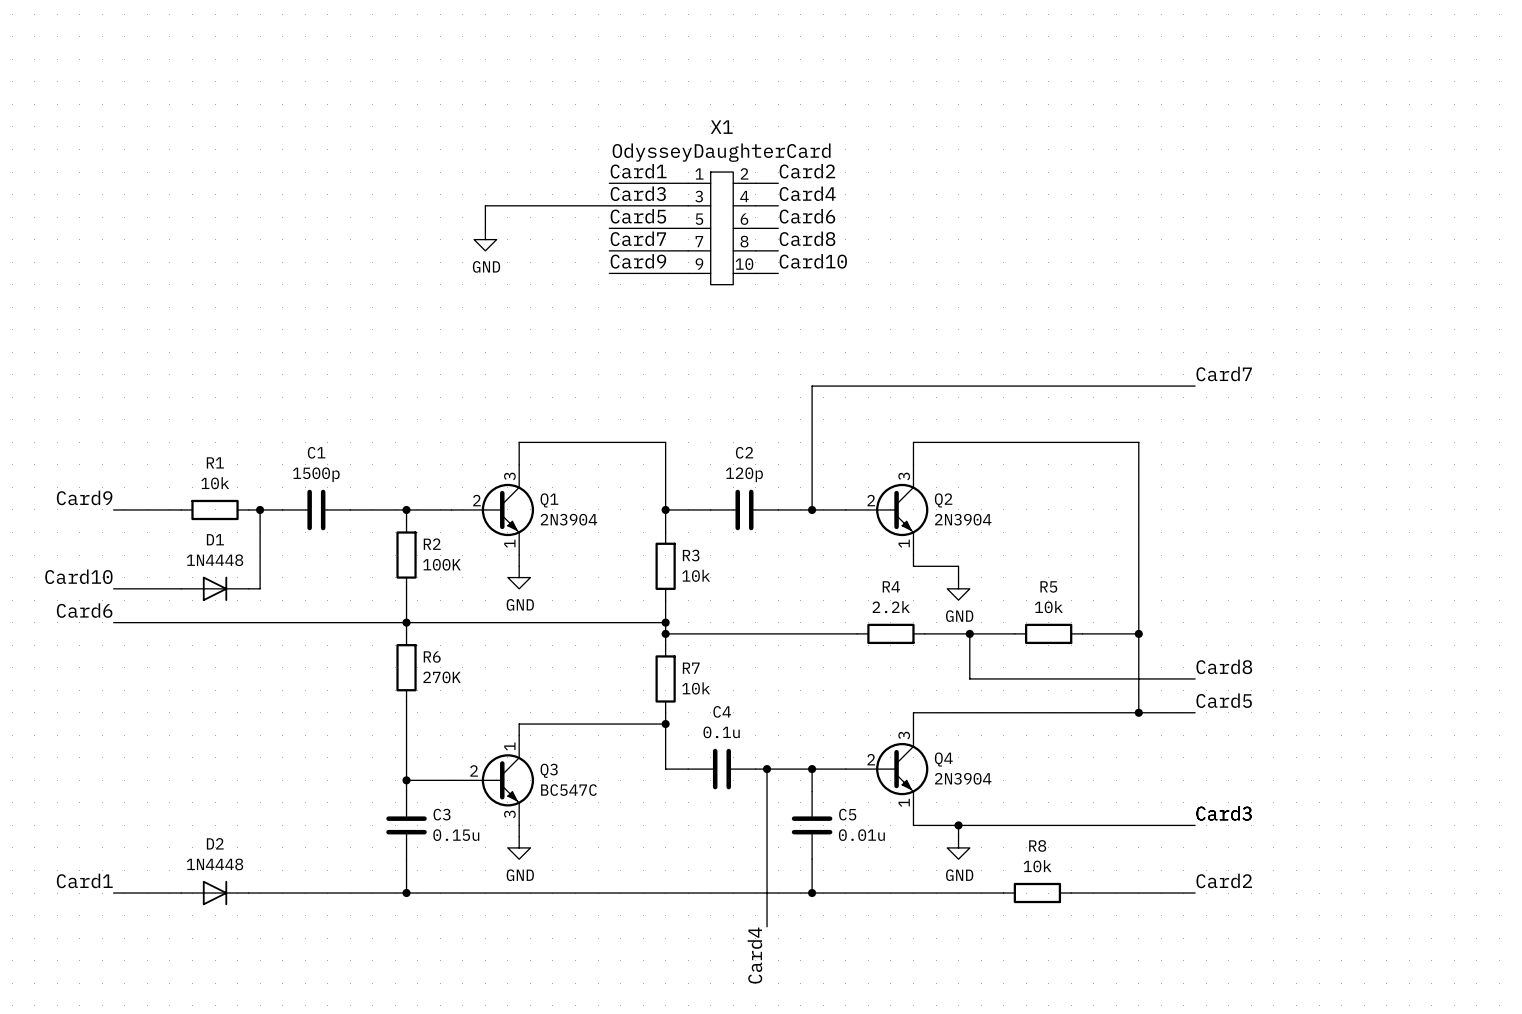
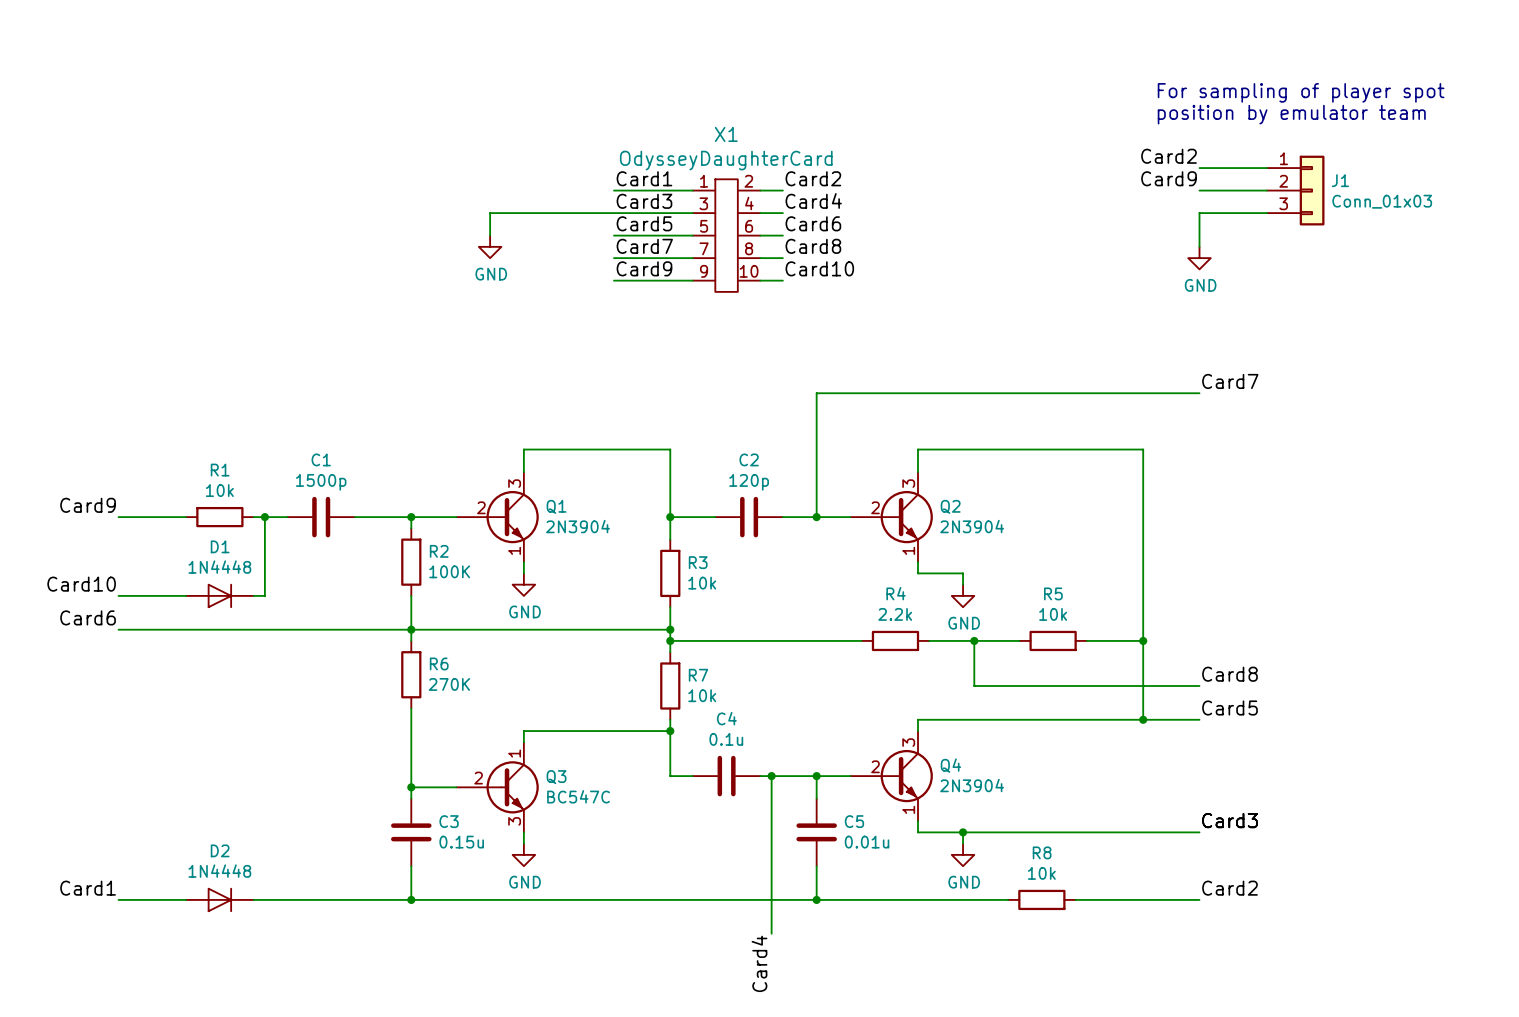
text: none -> For sampling of player spot (1301, 92)
text: none -> position by emulator team (1291, 114)
label: none -> Card2 (1169, 156)
wire: none -> (1199, 168) (1267, 168)
label: none -> Card9 (1169, 178)
wire: none -> (1199, 190) (1267, 190)
J1: none -> Conn_01x03 (1295, 190)
wire: none -> (1267, 213) (1199, 213) (1199, 246)
power symbol: none -> GND (1199, 258)

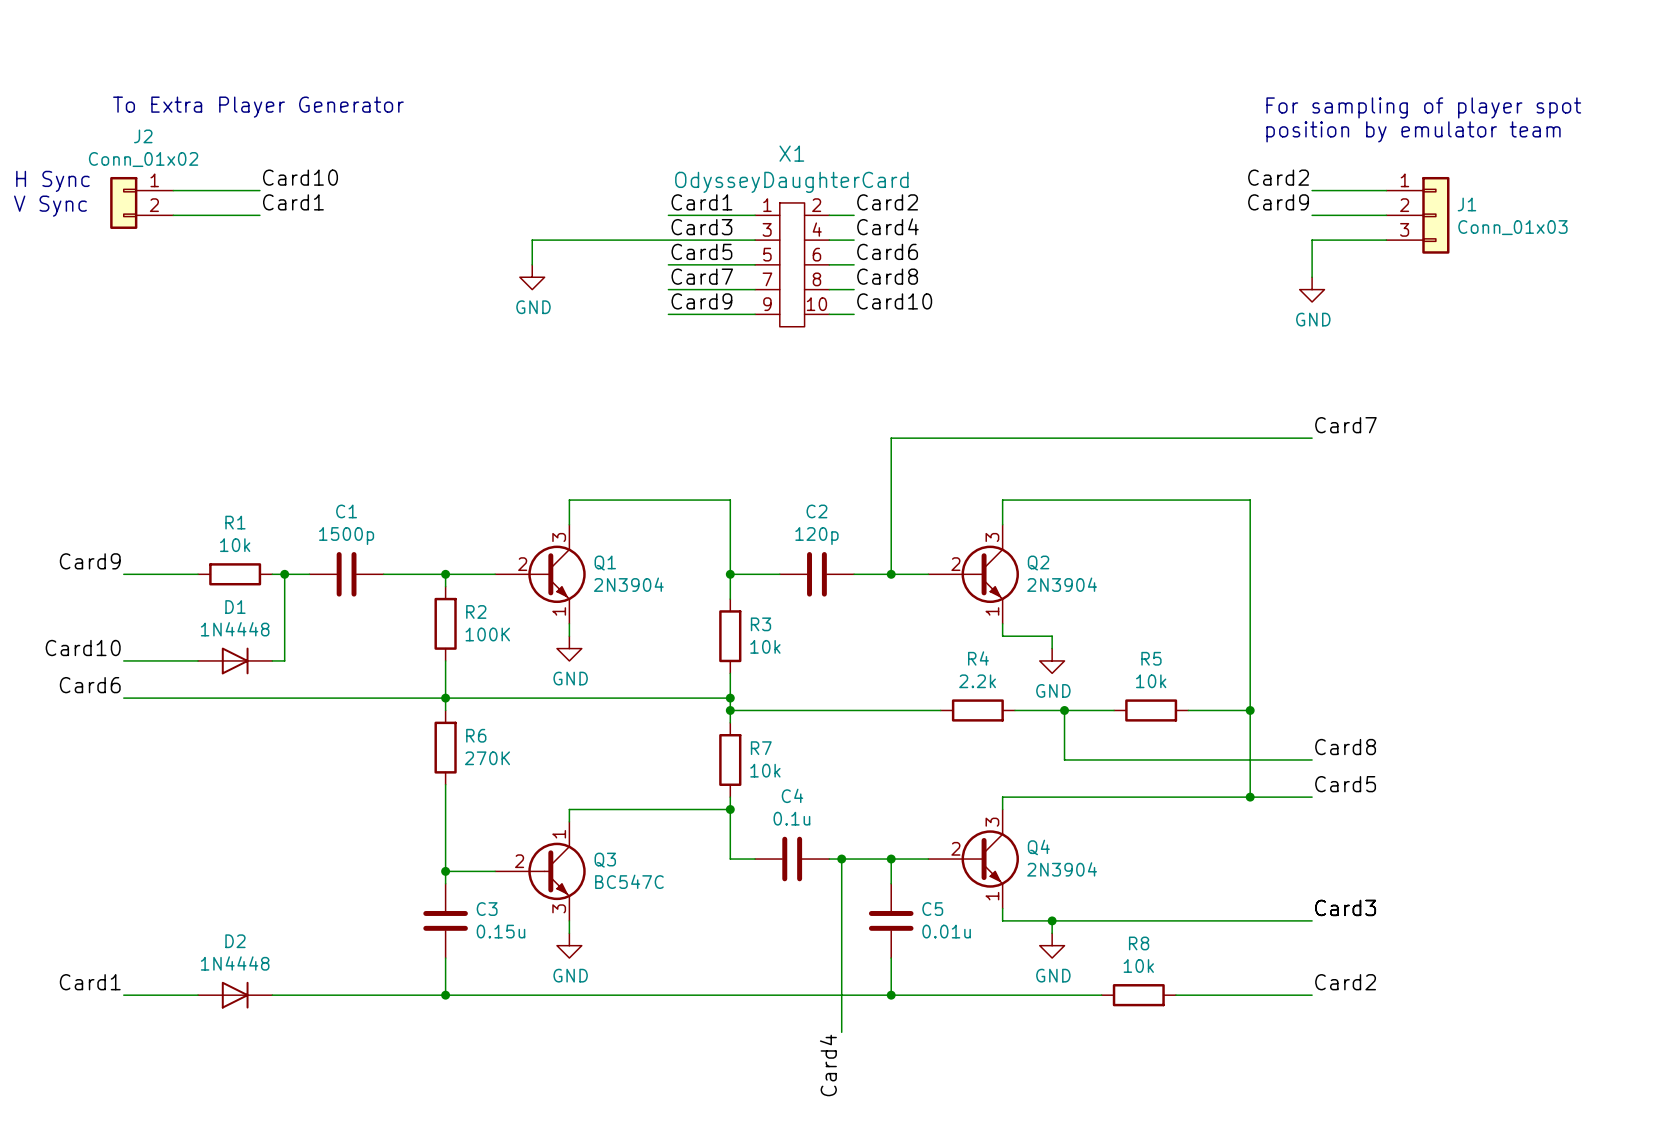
text: none -> To Extra Player Generator (258, 107)
label: none -> Card10 (300, 177)
text: none -> H Sync (52, 181)
wire: none -> (173, 190) (259, 190)
label: none -> Card1 (293, 202)
J2: none -> Conn_01x02 (141, 202)
text: none -> V Sync (50, 206)
wire: none -> (173, 215) (259, 215)

